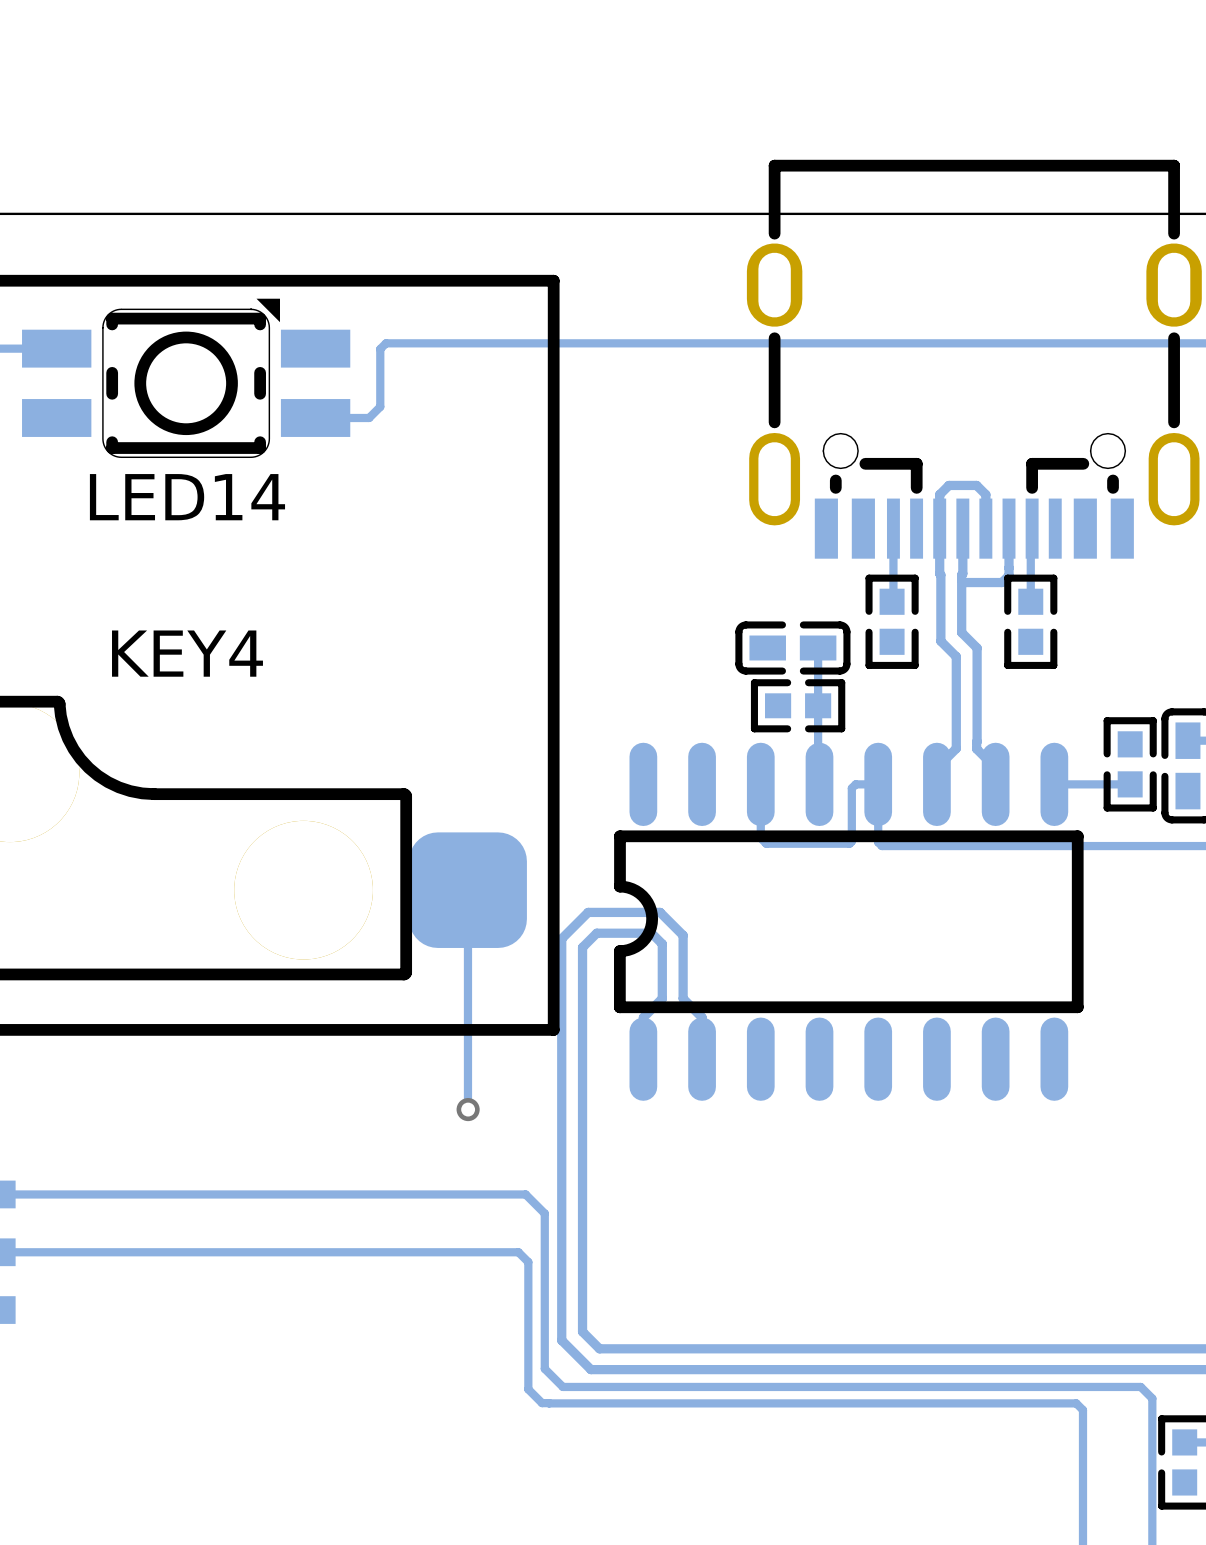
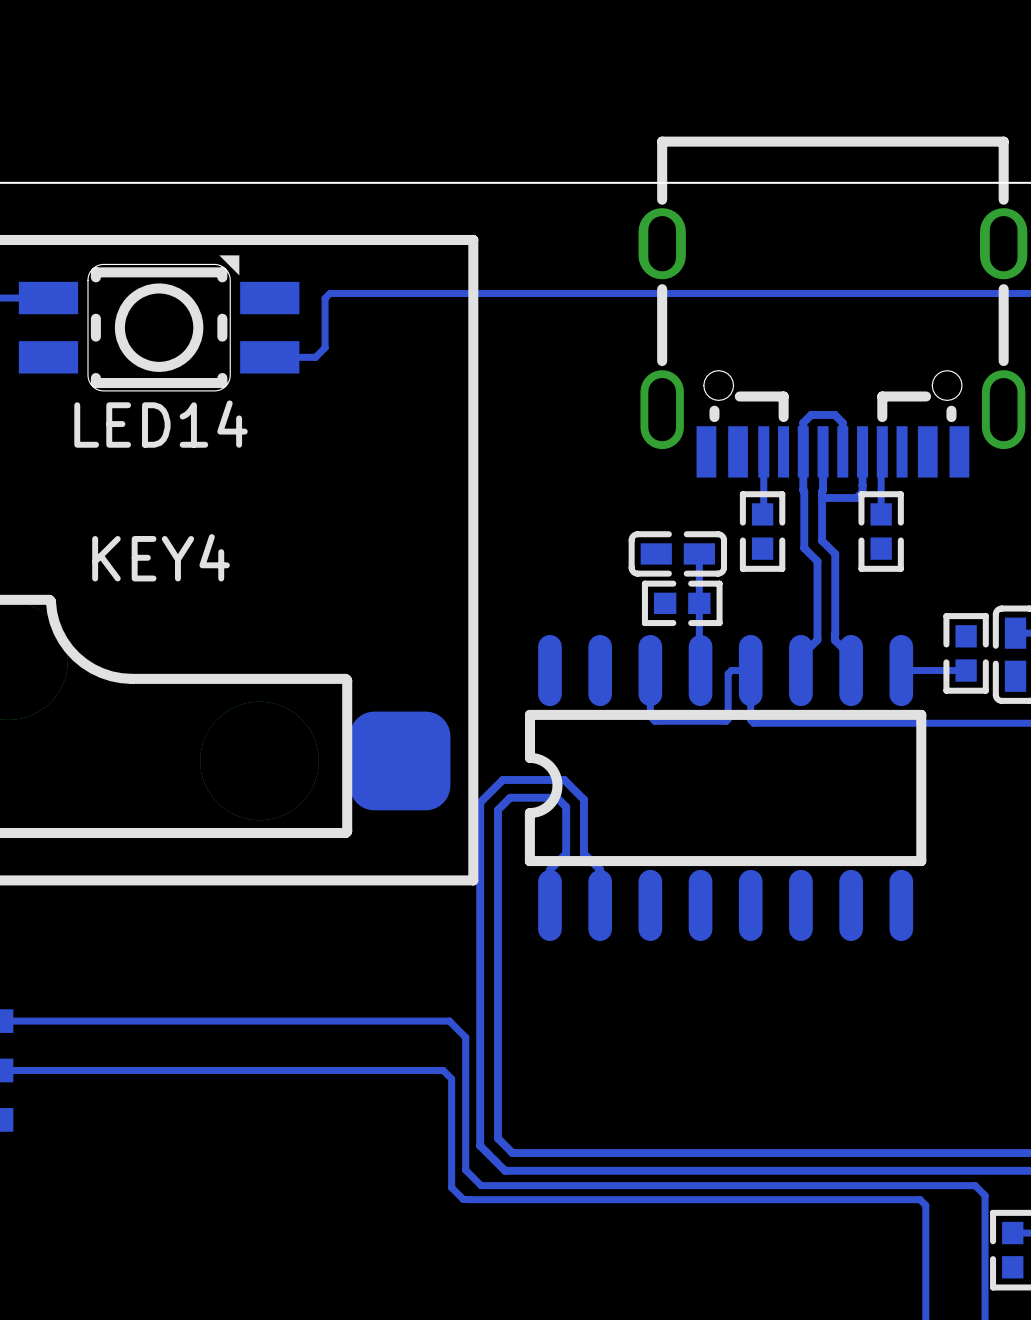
track: (467, 890) (467, 1109) -> none
via: (468, 1109) -> none

